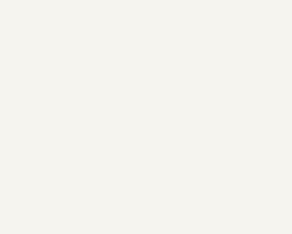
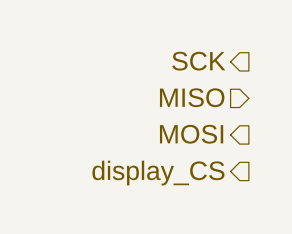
hierarchical label: none -> SCK (198, 61)
hierarchical label: none -> MISO (192, 97)
hierarchical label: none -> MOSI (191, 134)
hierarchical label: none -> display_CS (158, 173)

